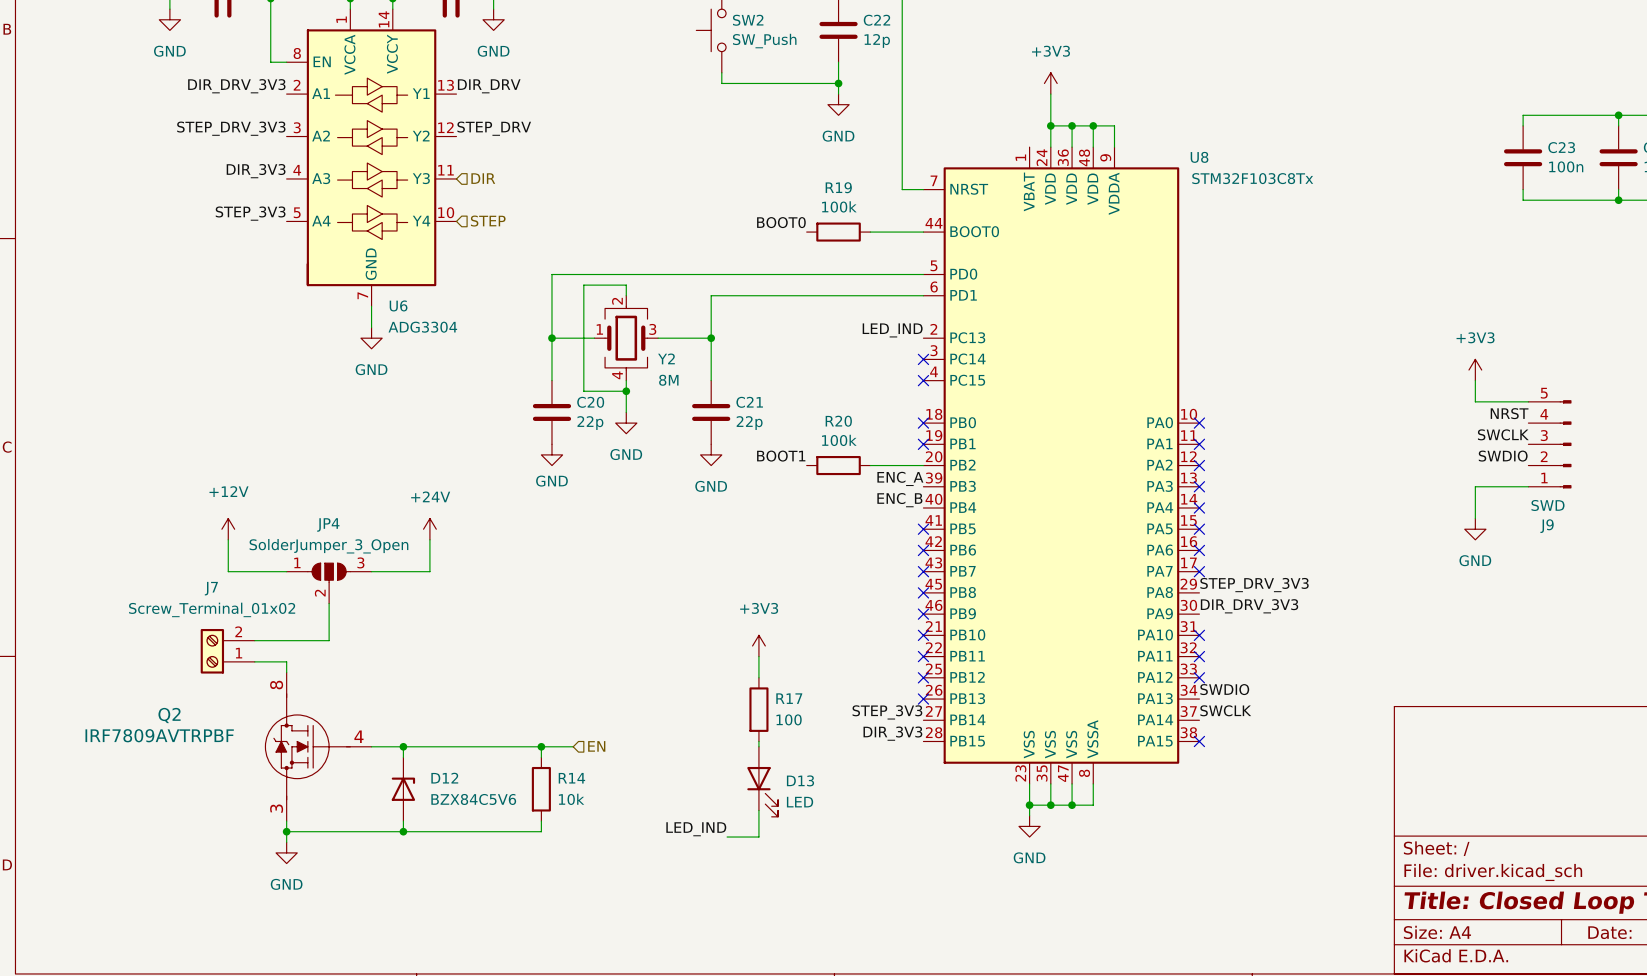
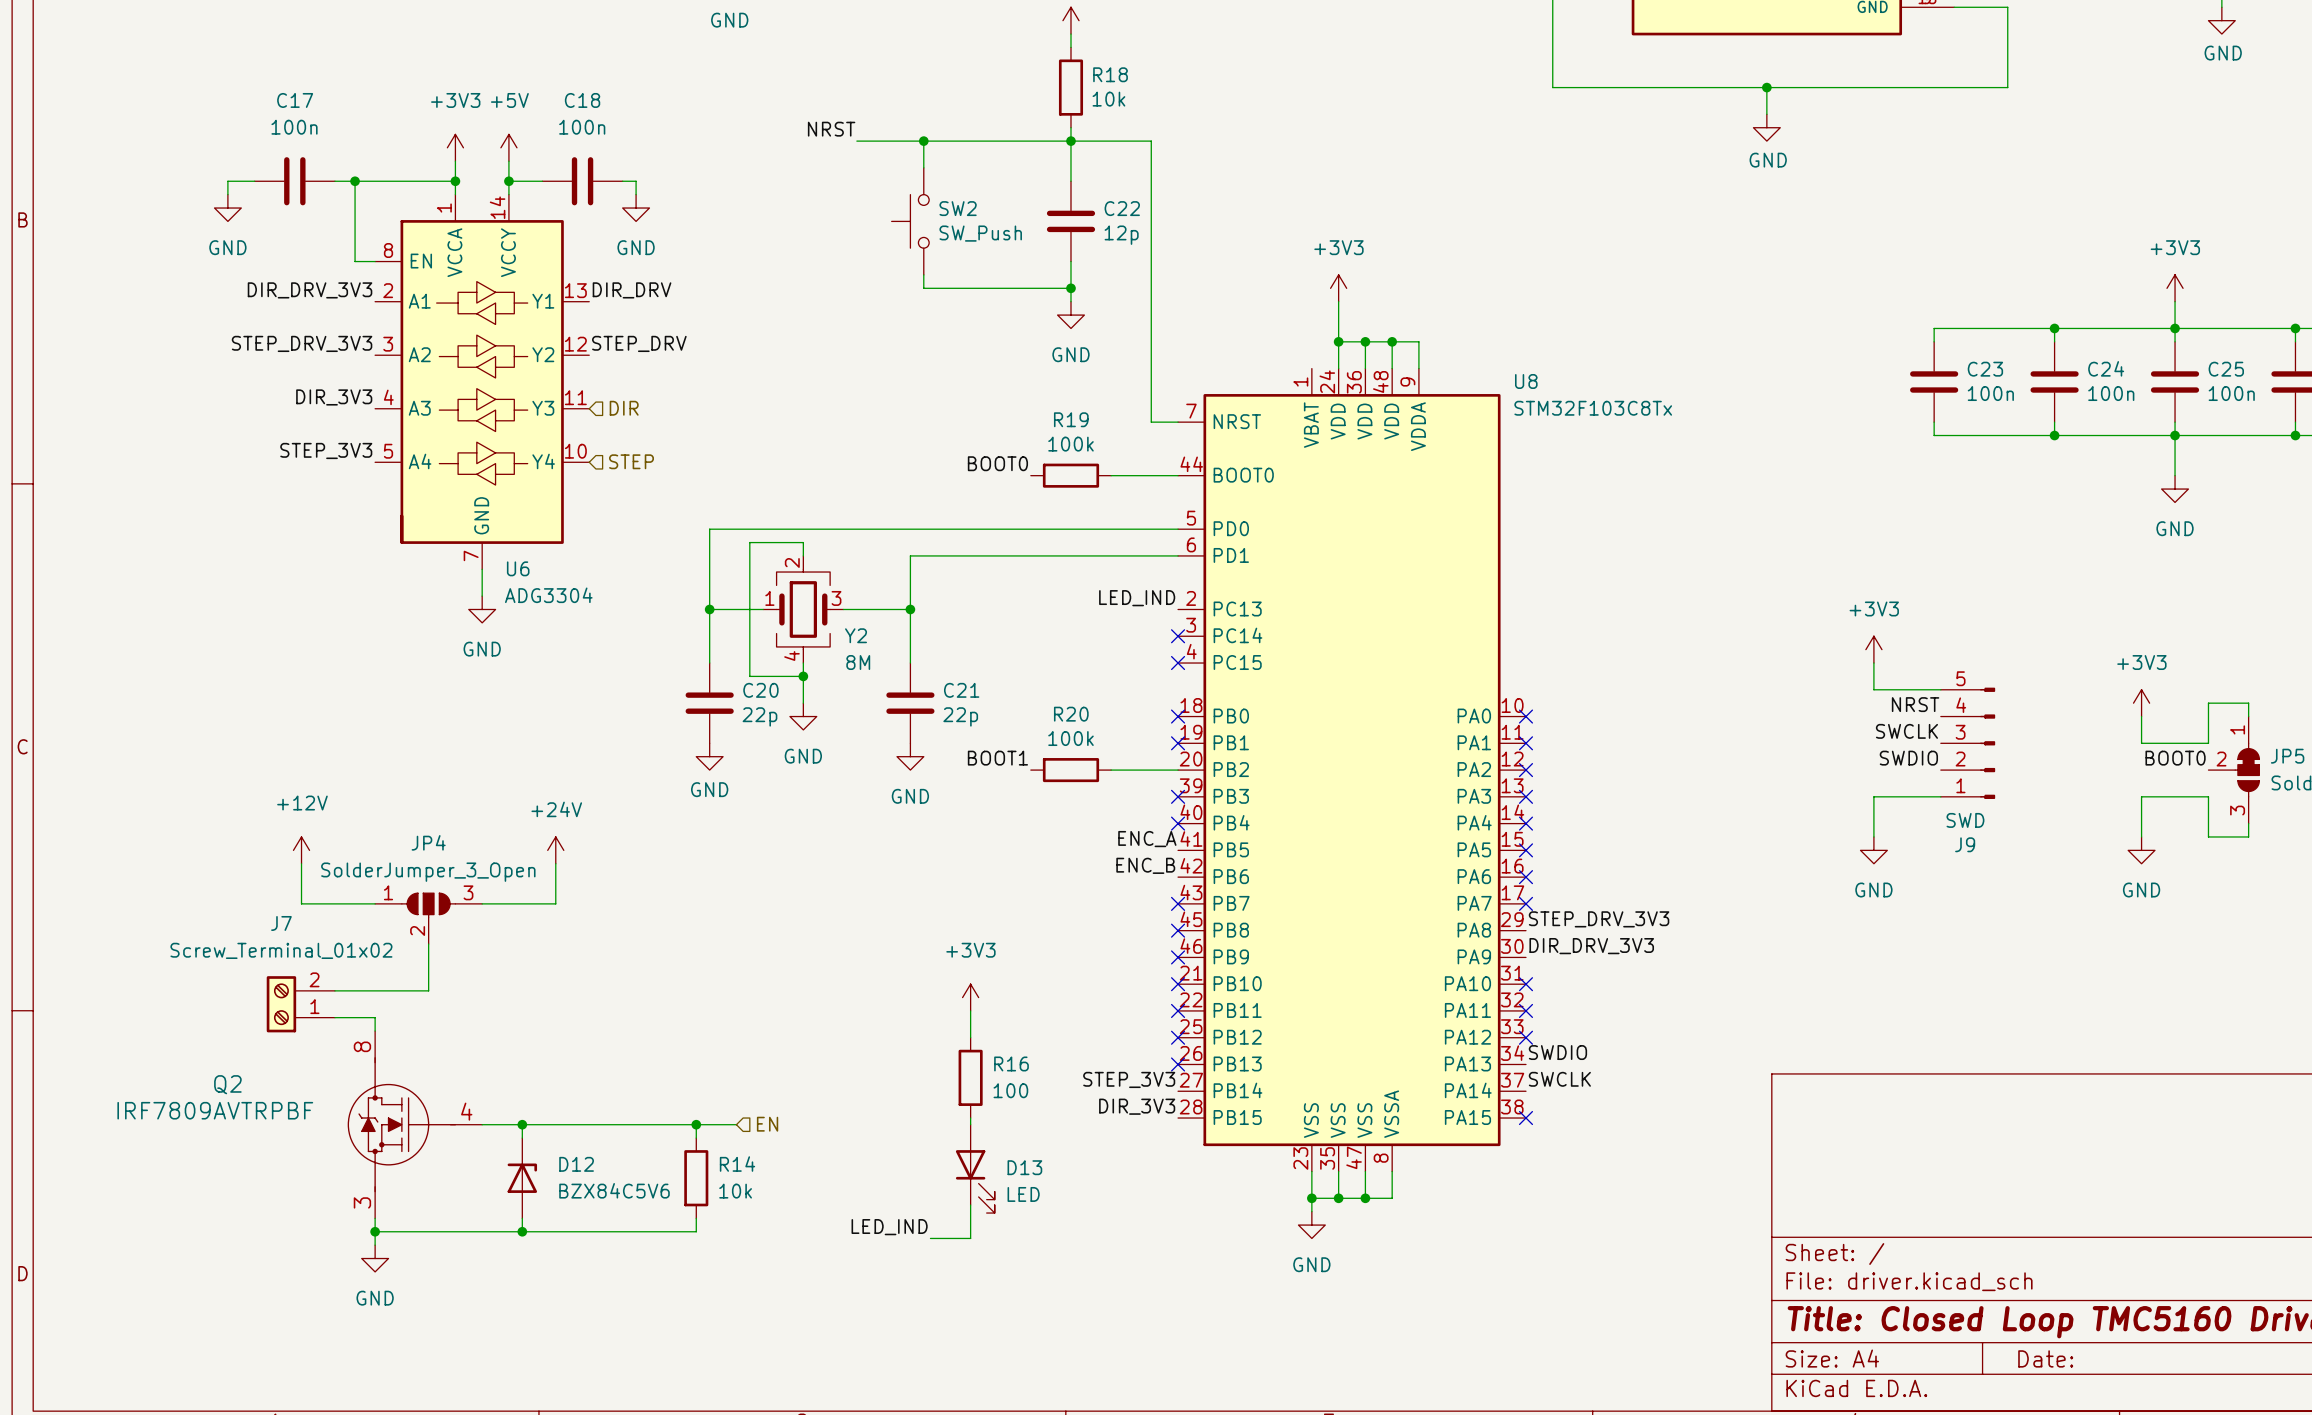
label position: ENC_A (900, 478) -> ENC_A (1147, 839)
no-connect mark: none -> (1178, 796)
label position: ENC_B (899, 500) -> ENC_B (1145, 865)
no-connect mark: none -> (1178, 823)
no-connect mark: (923, 529) -> none
no-connect mark: (923, 550) -> none
R17 name: R17 (789, 698) -> R16 (1011, 1063)

